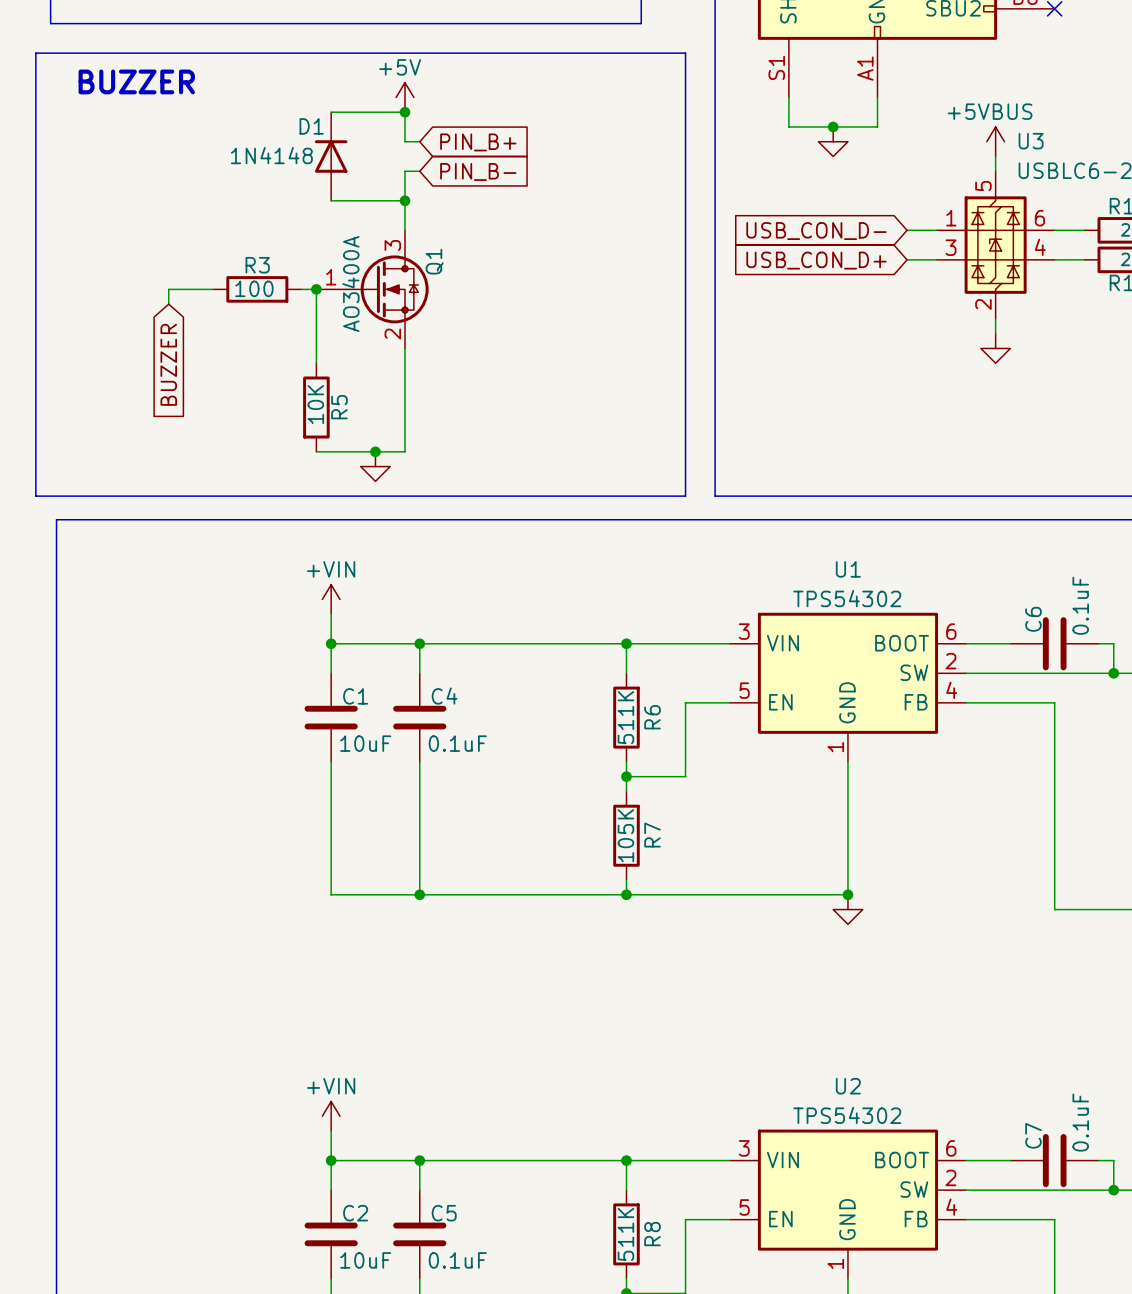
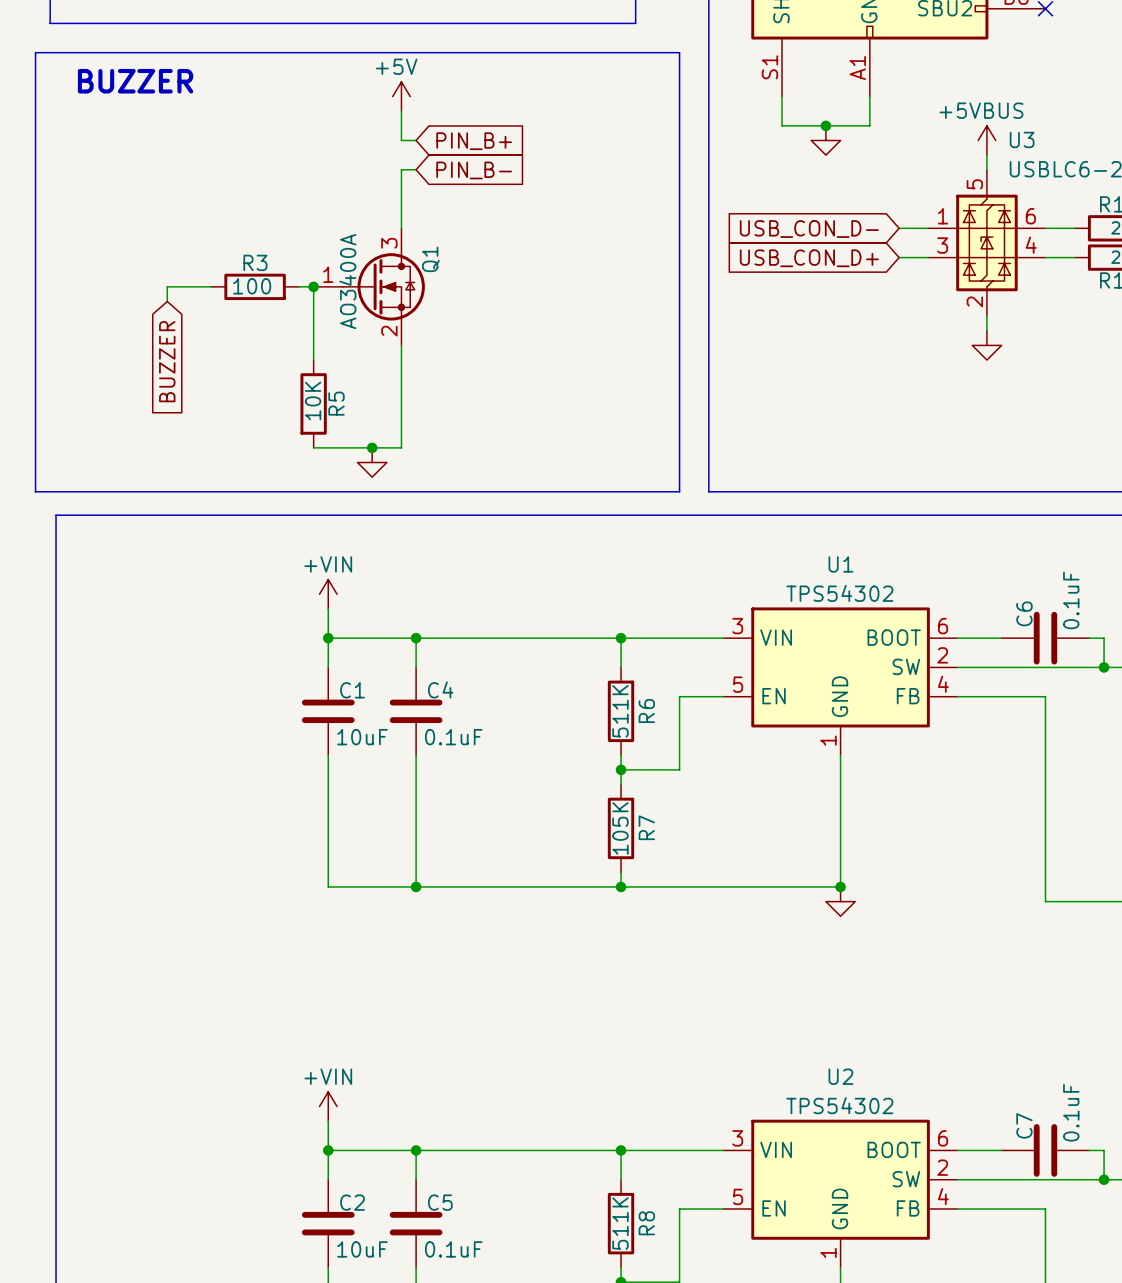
wire: (331, 112) (404, 112) -> none
junction: (404, 112) -> none
D1: 1N4148 (331, 156) -> none
wire: (331, 200) (404, 200) -> none
junction: (404, 200) -> none

